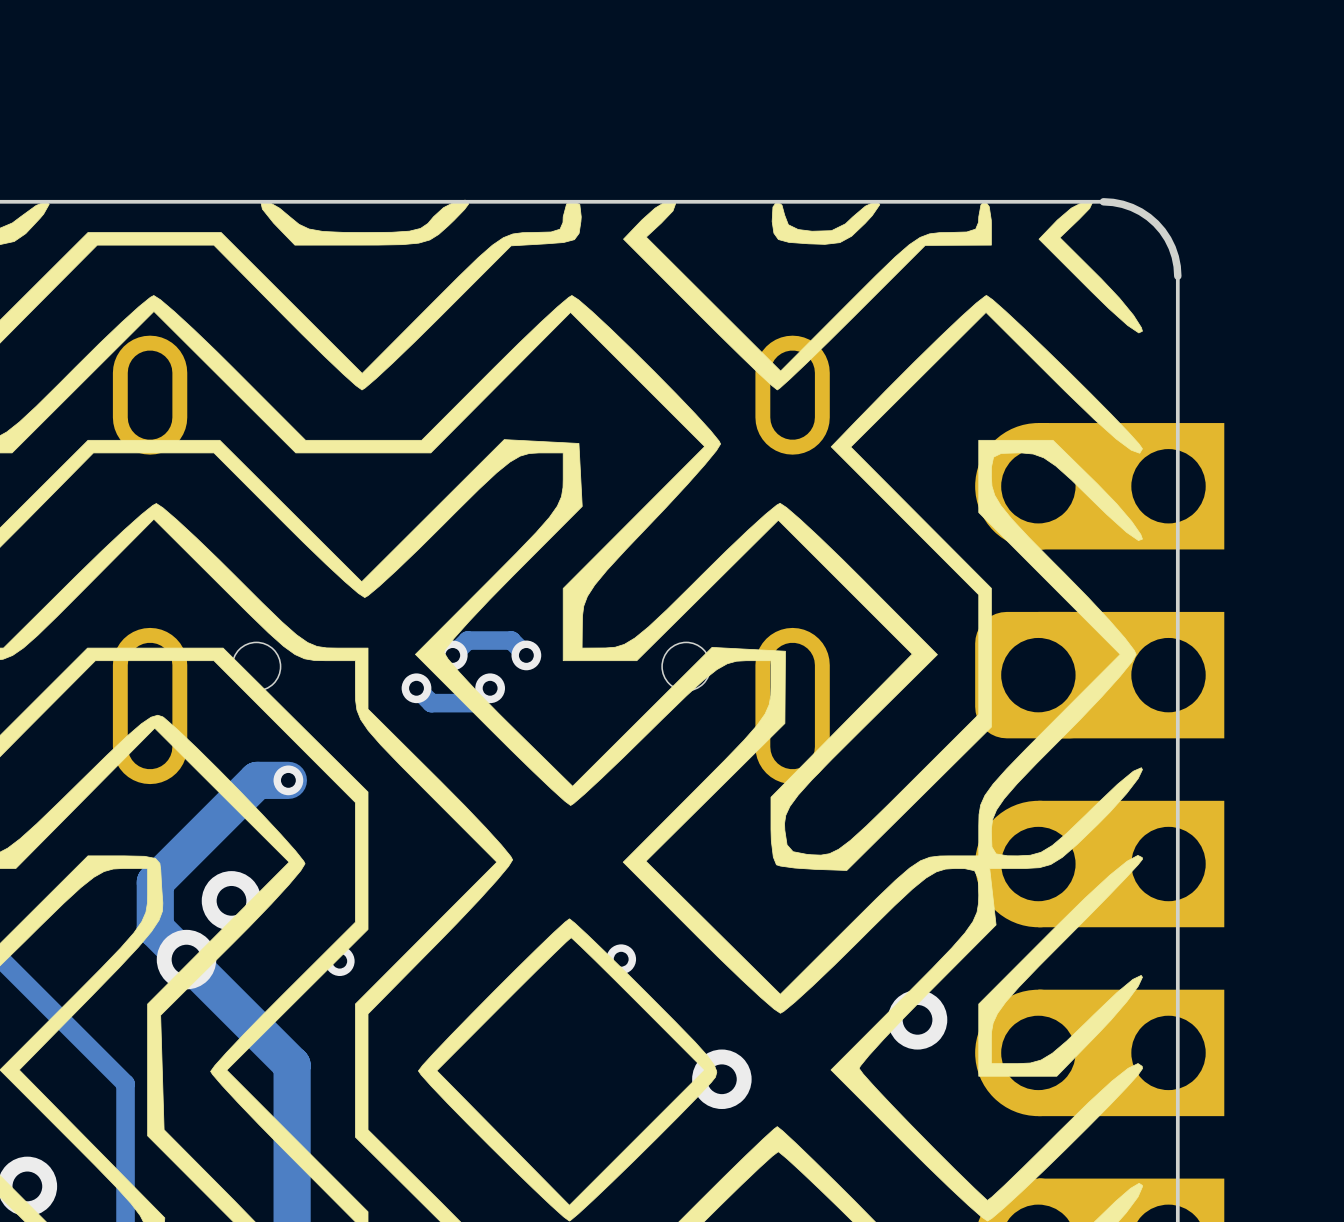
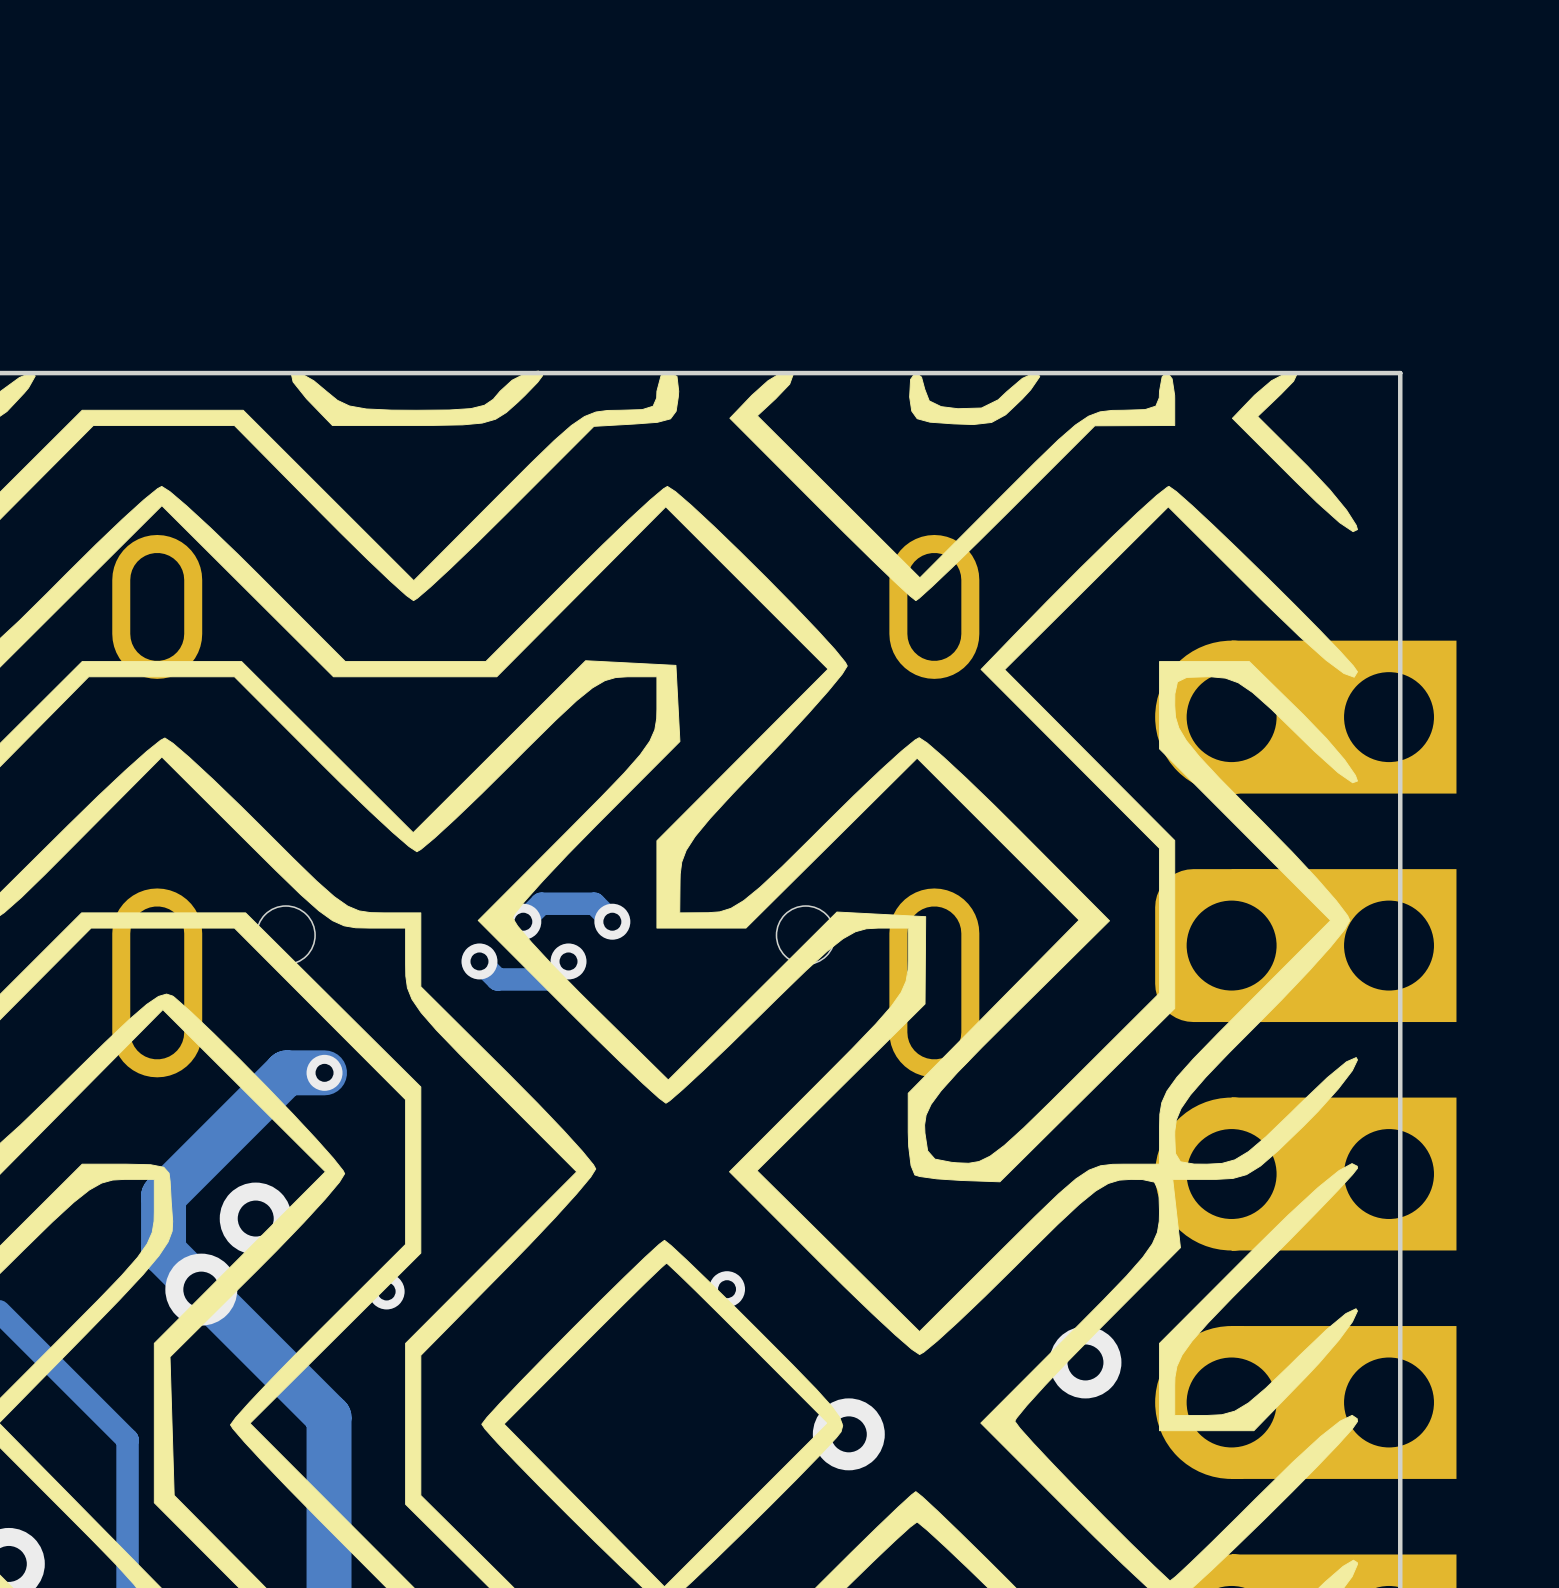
board edge: (1103, 201) (1131, 207) (1156, 223) (1172, 247) (1177, 276) -> (1310, 373) (1400, 373) (1400, 463)

